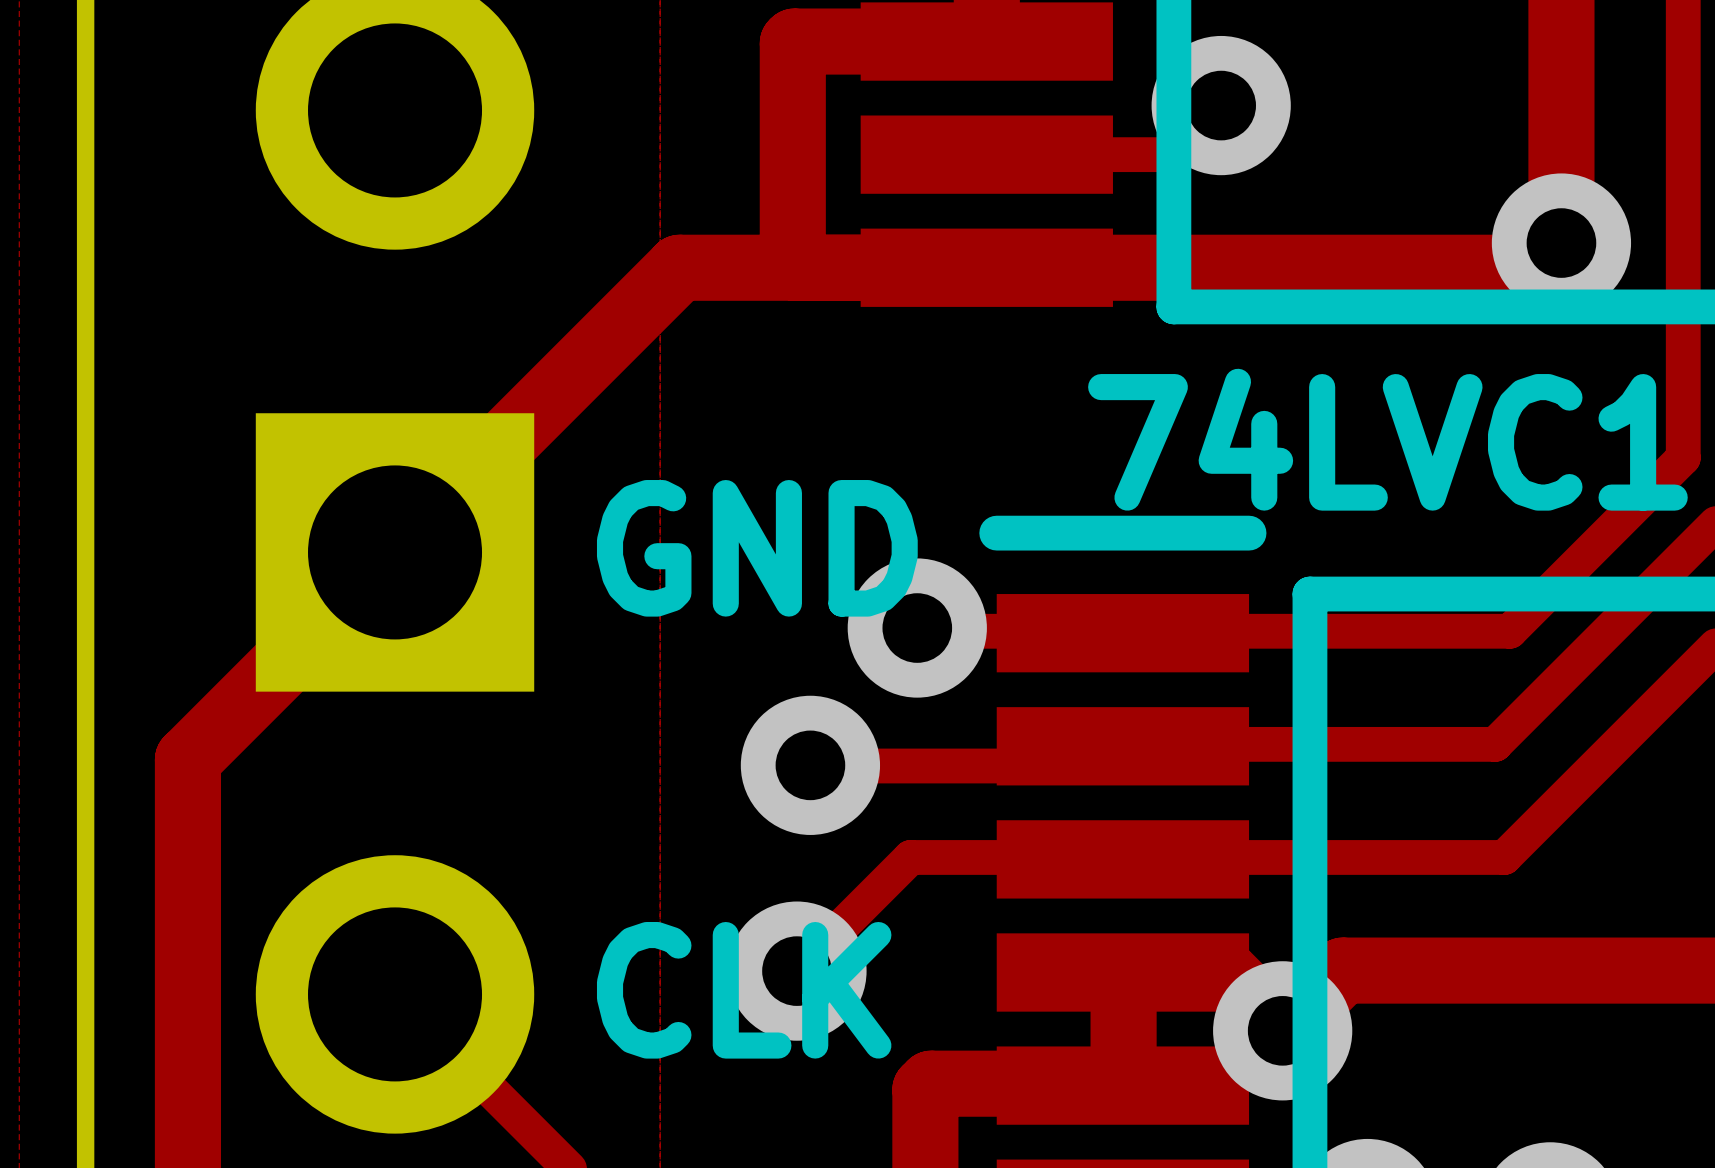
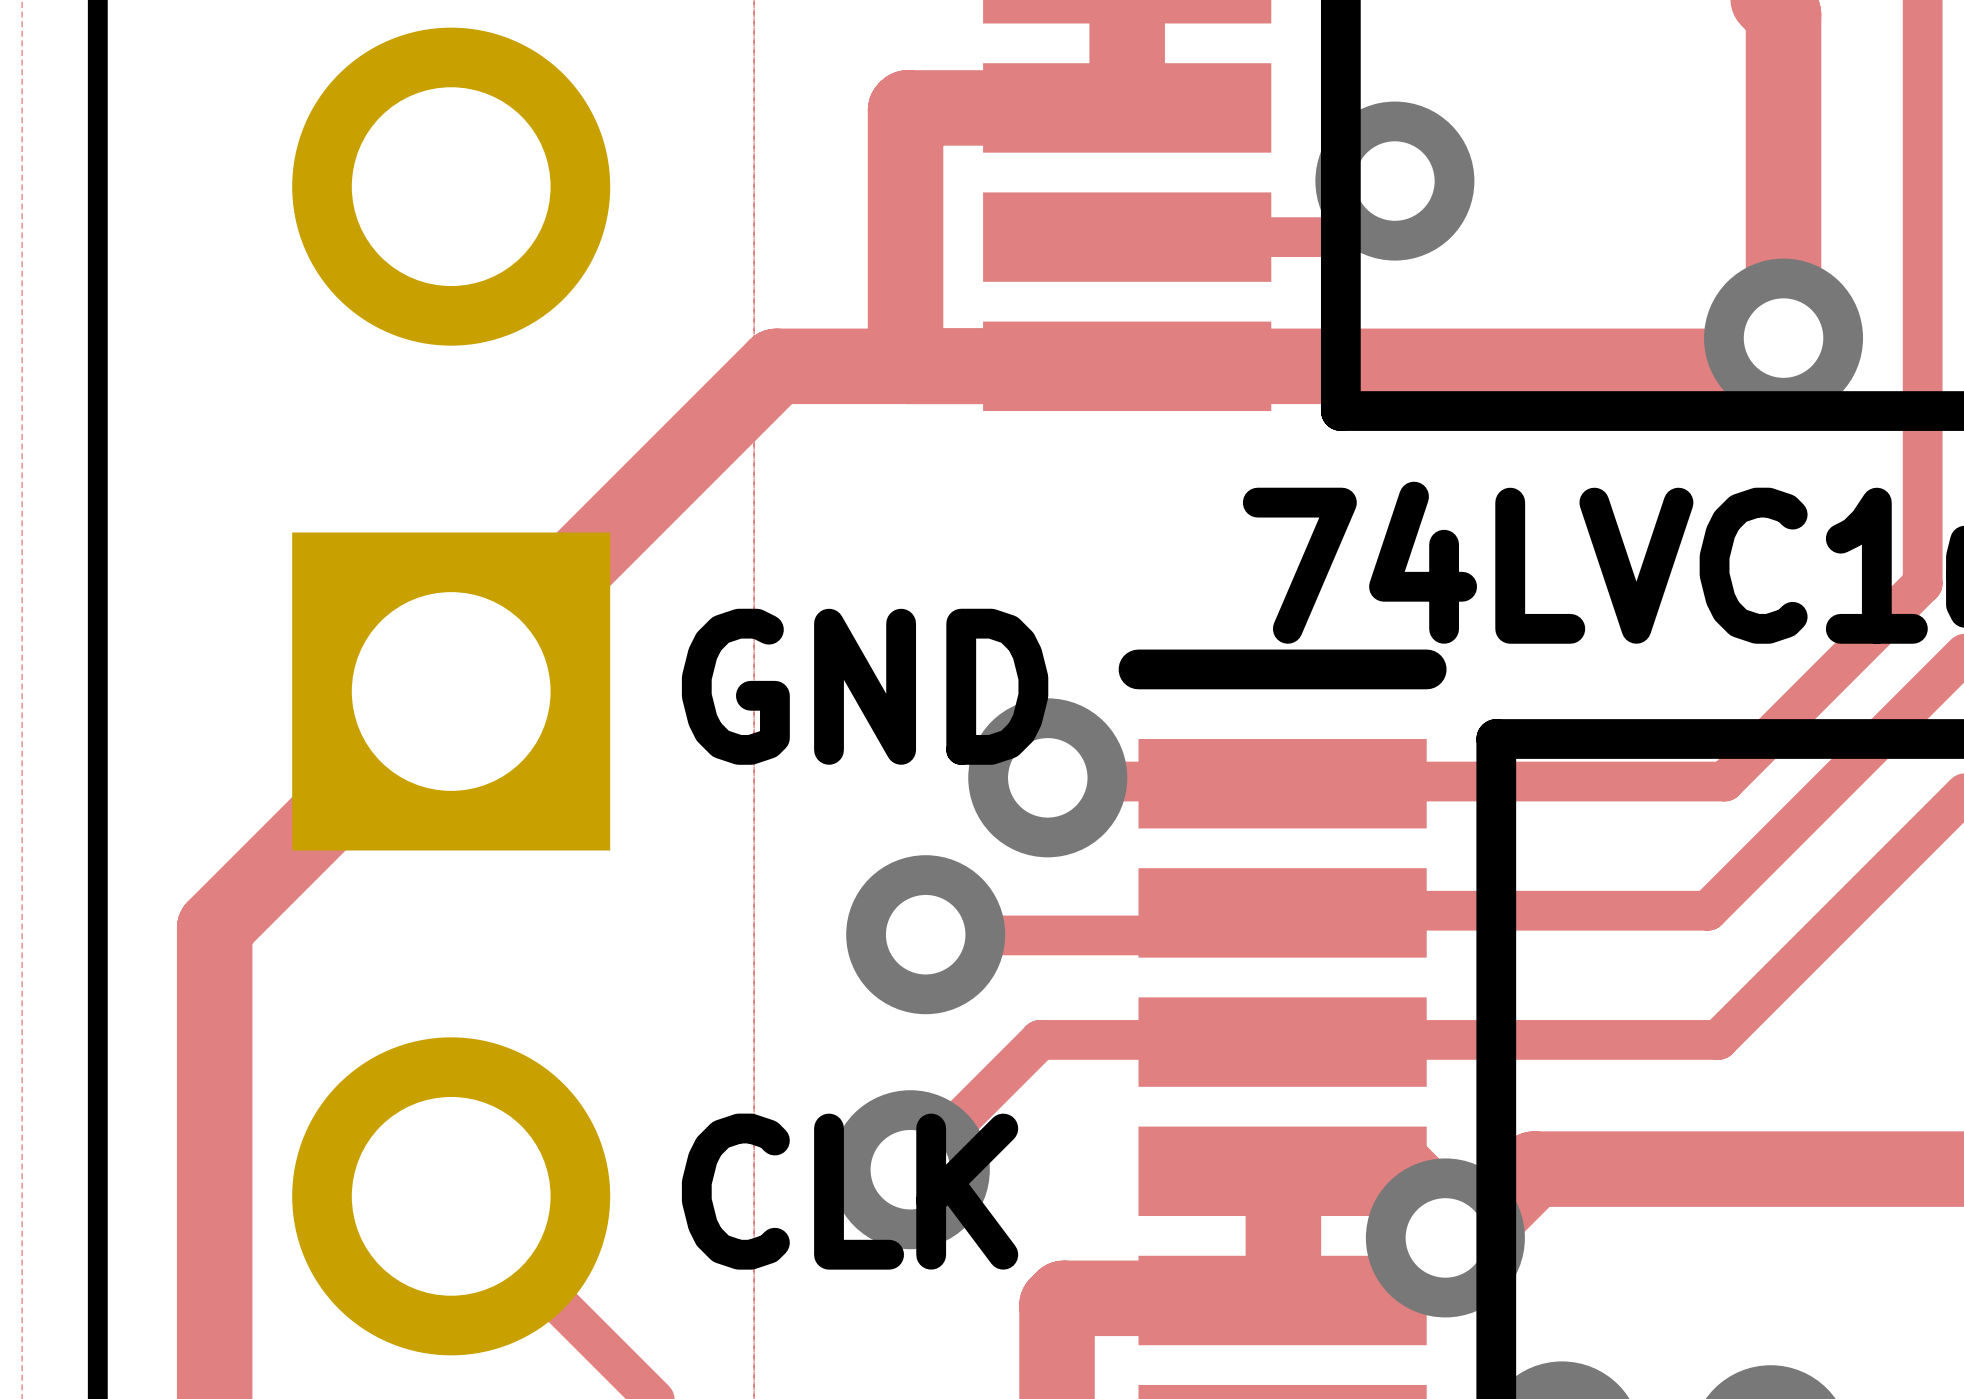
via position: (1282, 1030) -> (1445, 1237)

